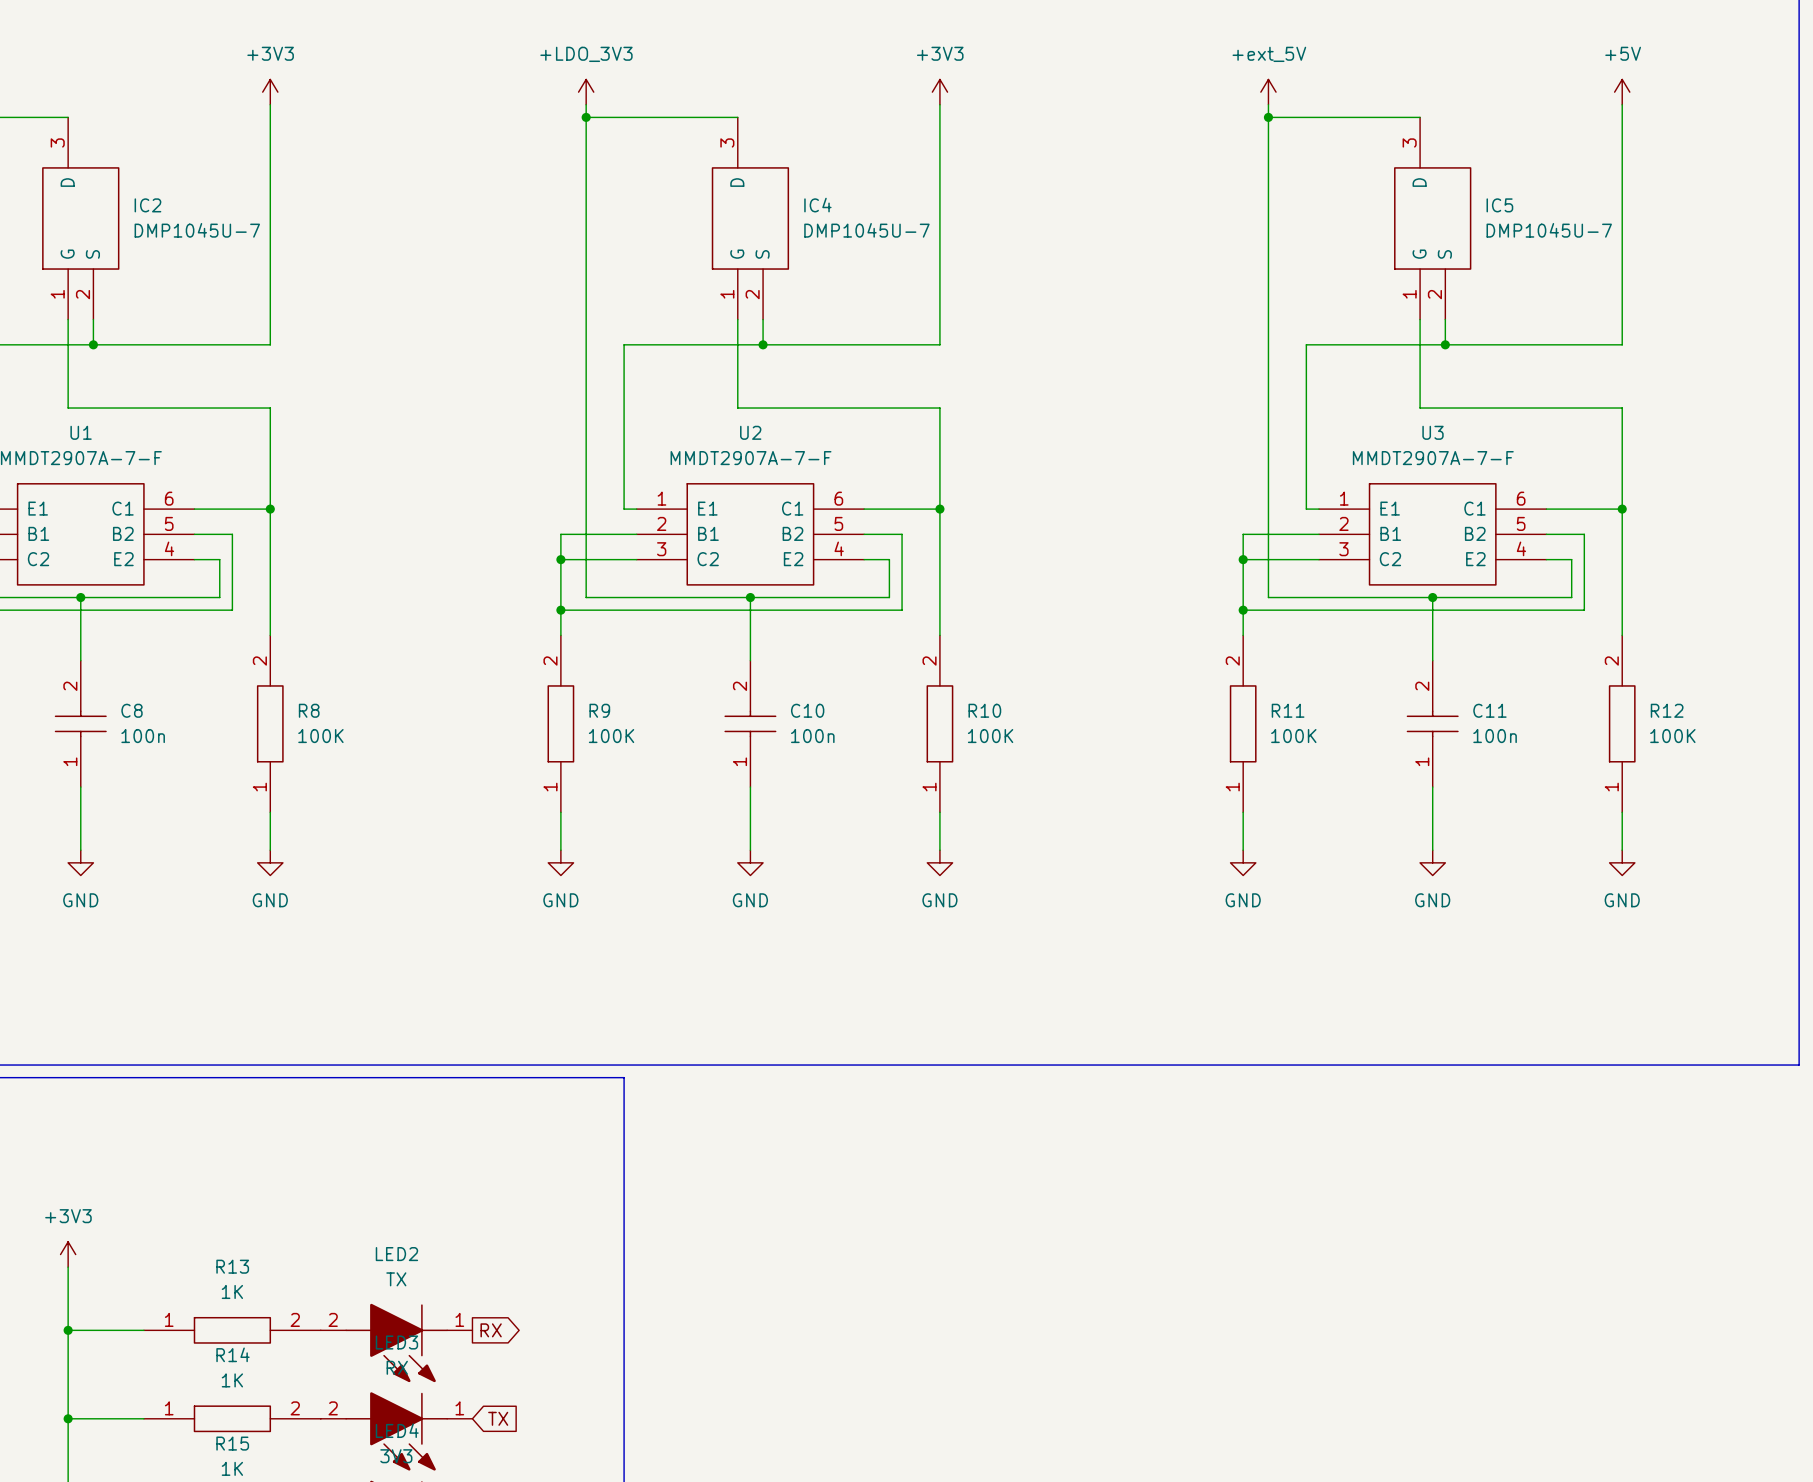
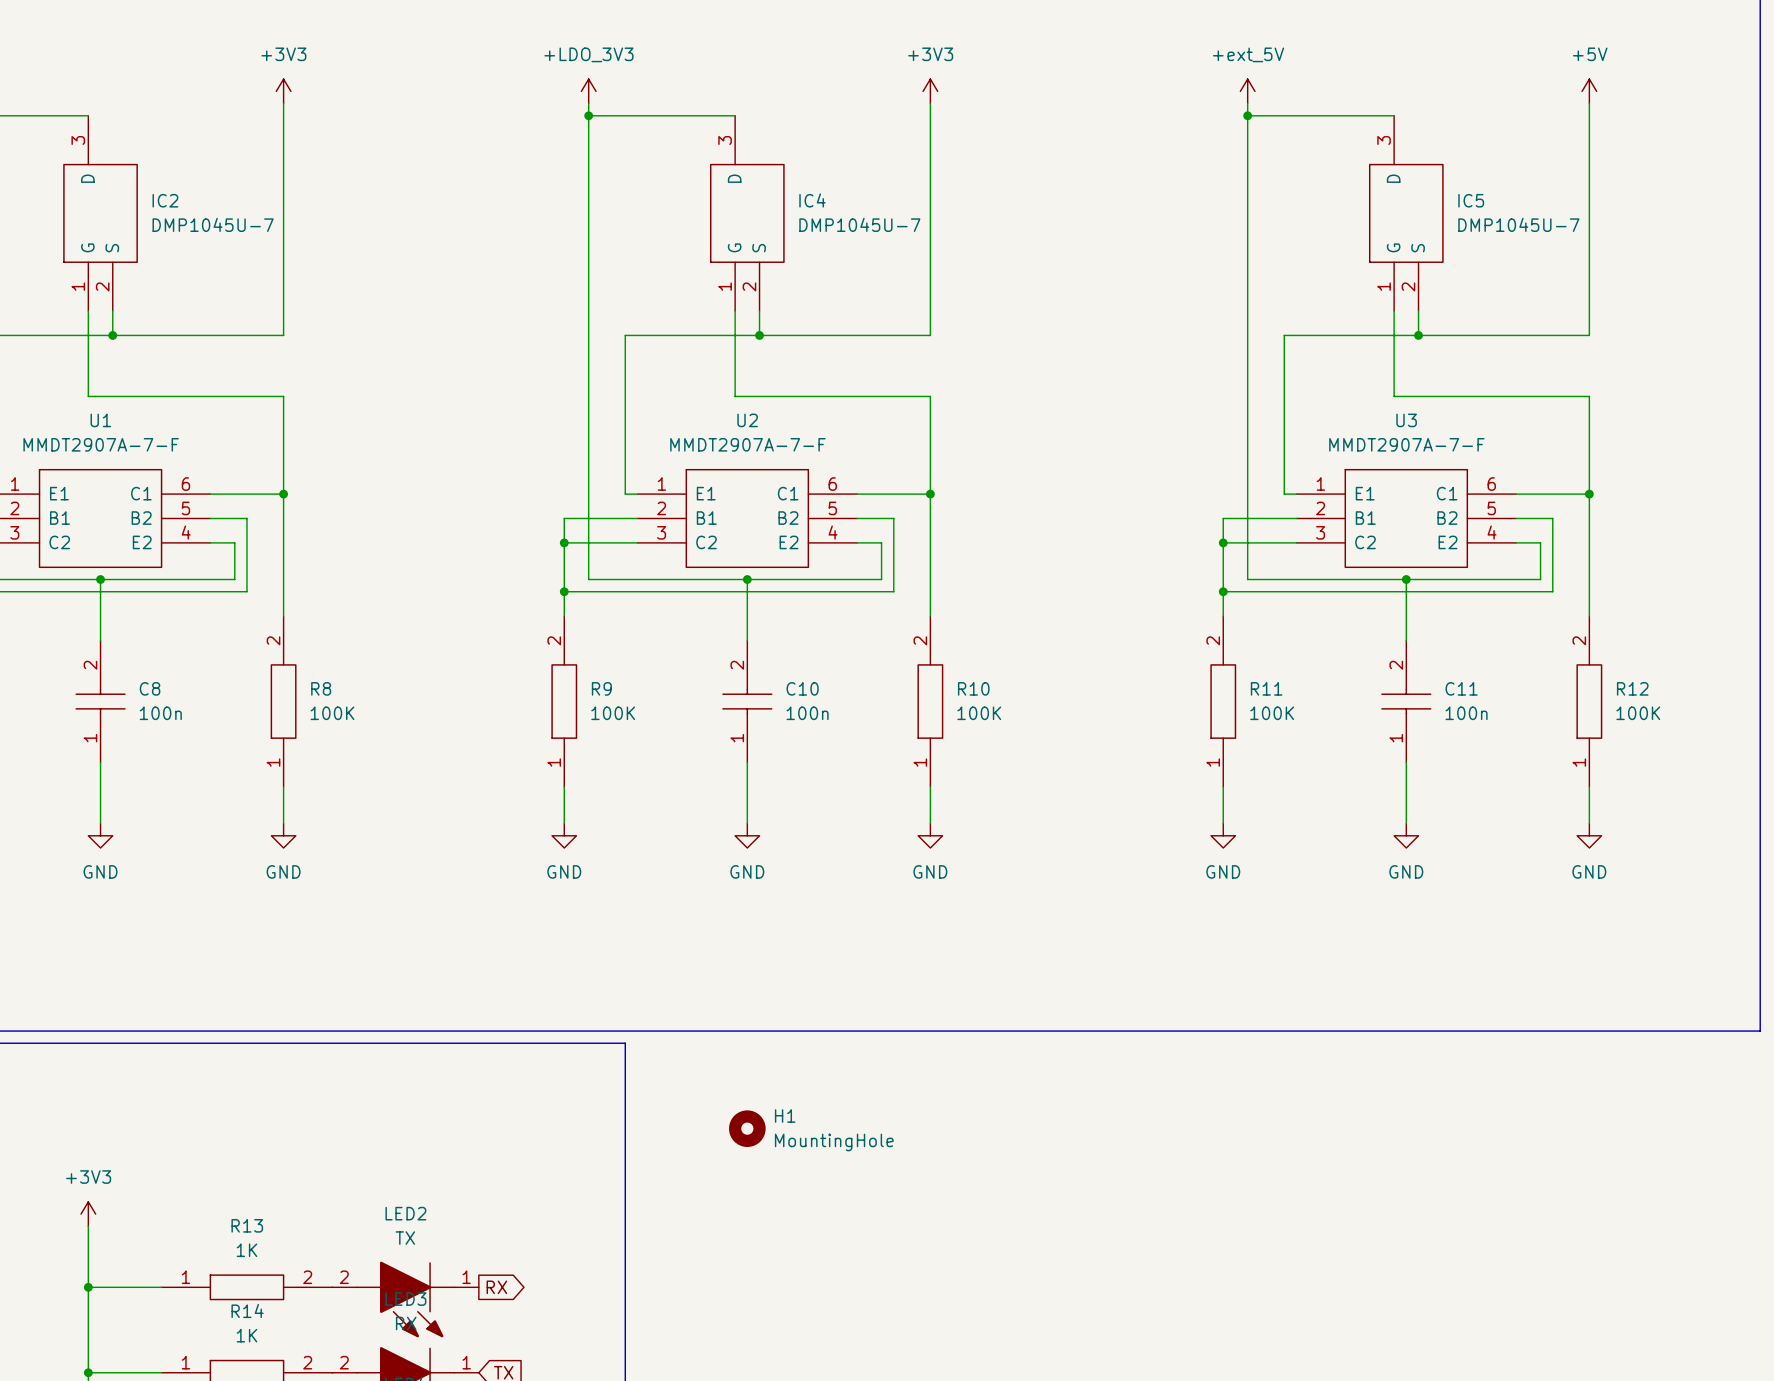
H1: none -> MountingHole (747, 1128)

